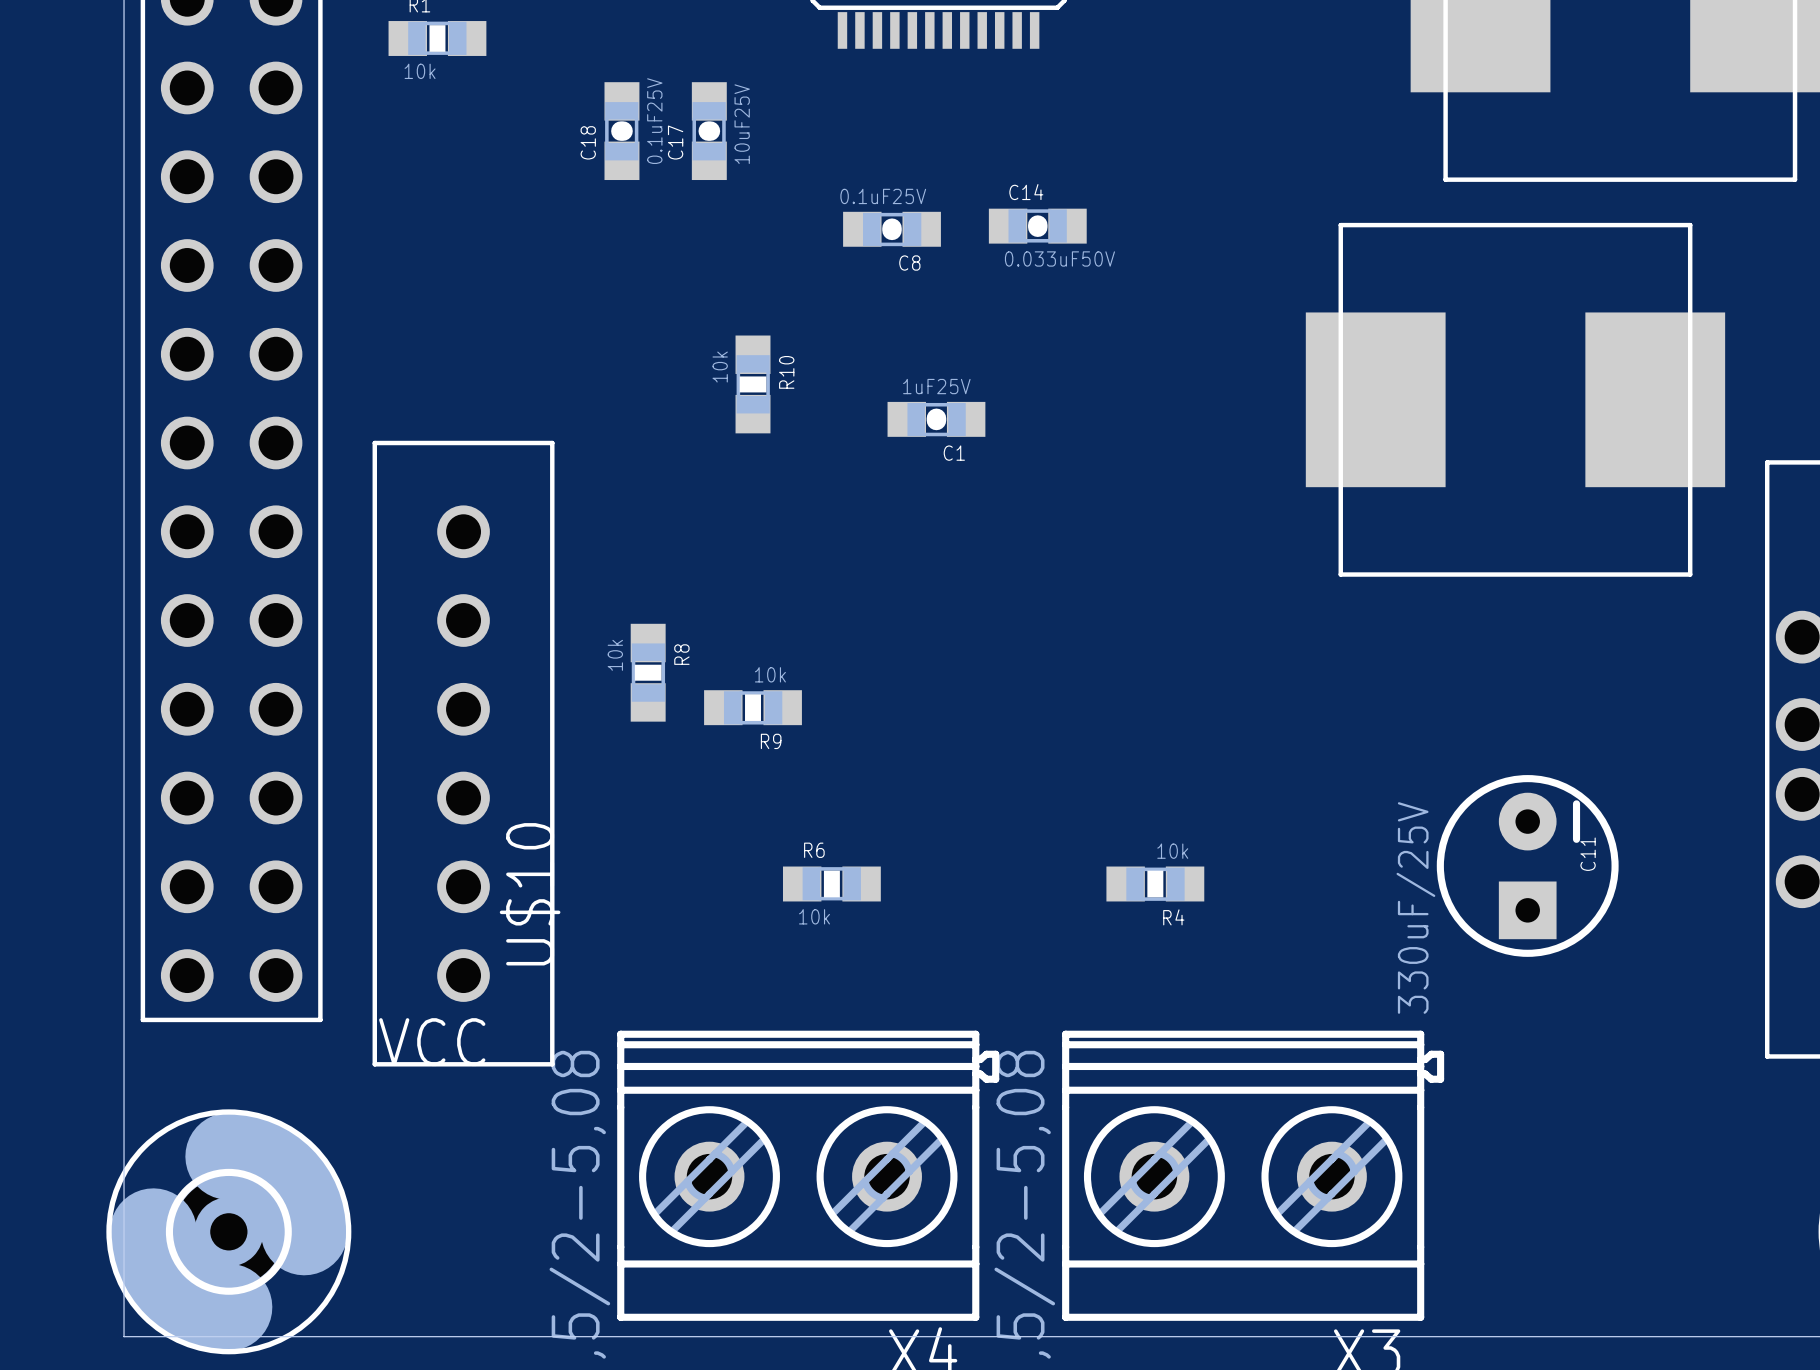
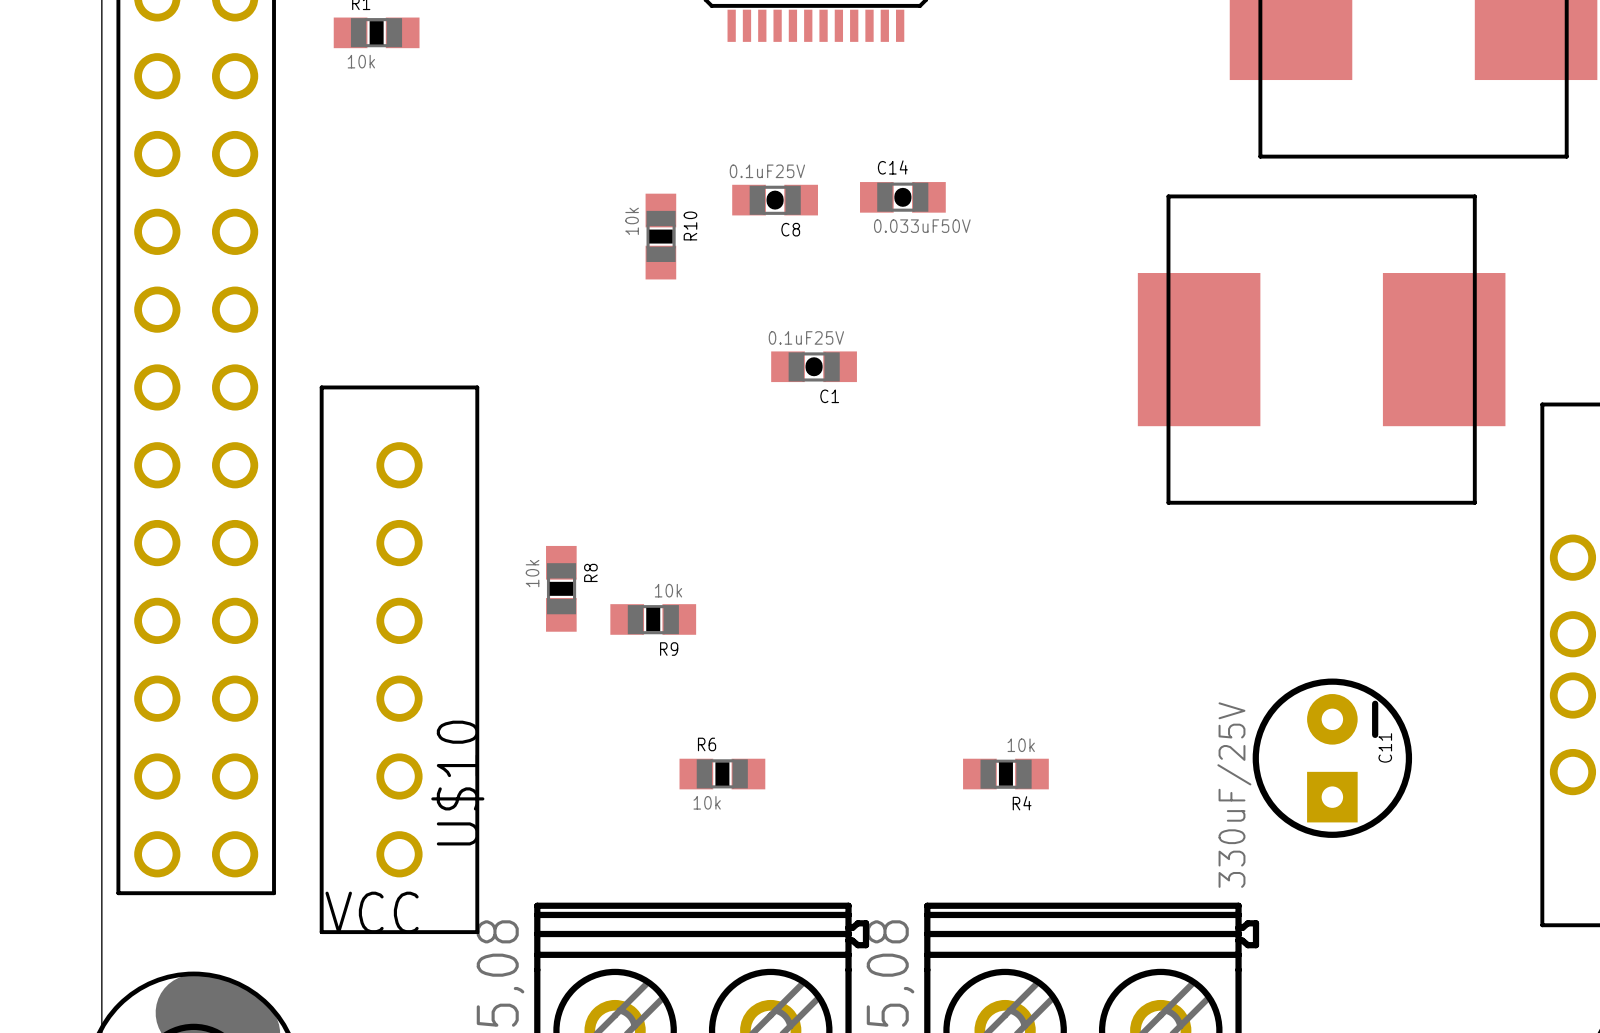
C18: 0.1uF25V (621, 131) -> none
C17: 10uF25V (709, 131) -> none
R10 position: (753, 384) -> (660, 236)
C1 value: 1uF25V (936, 386) -> 0.1uF25V (806, 337)

